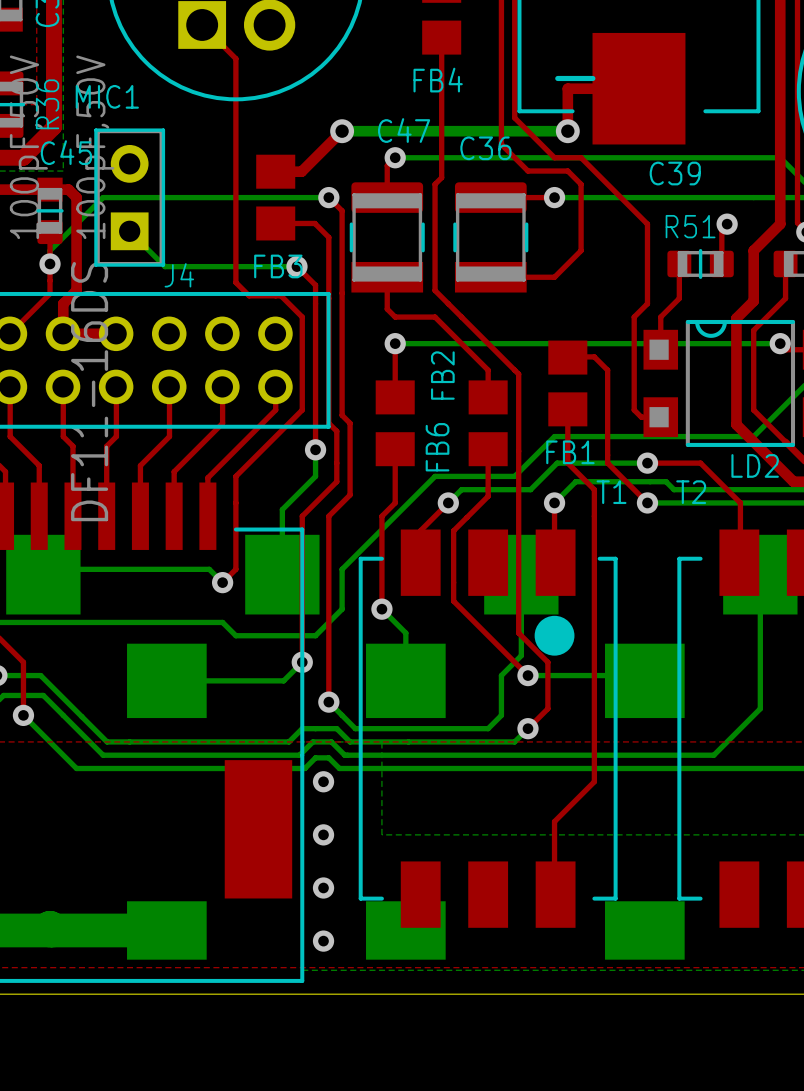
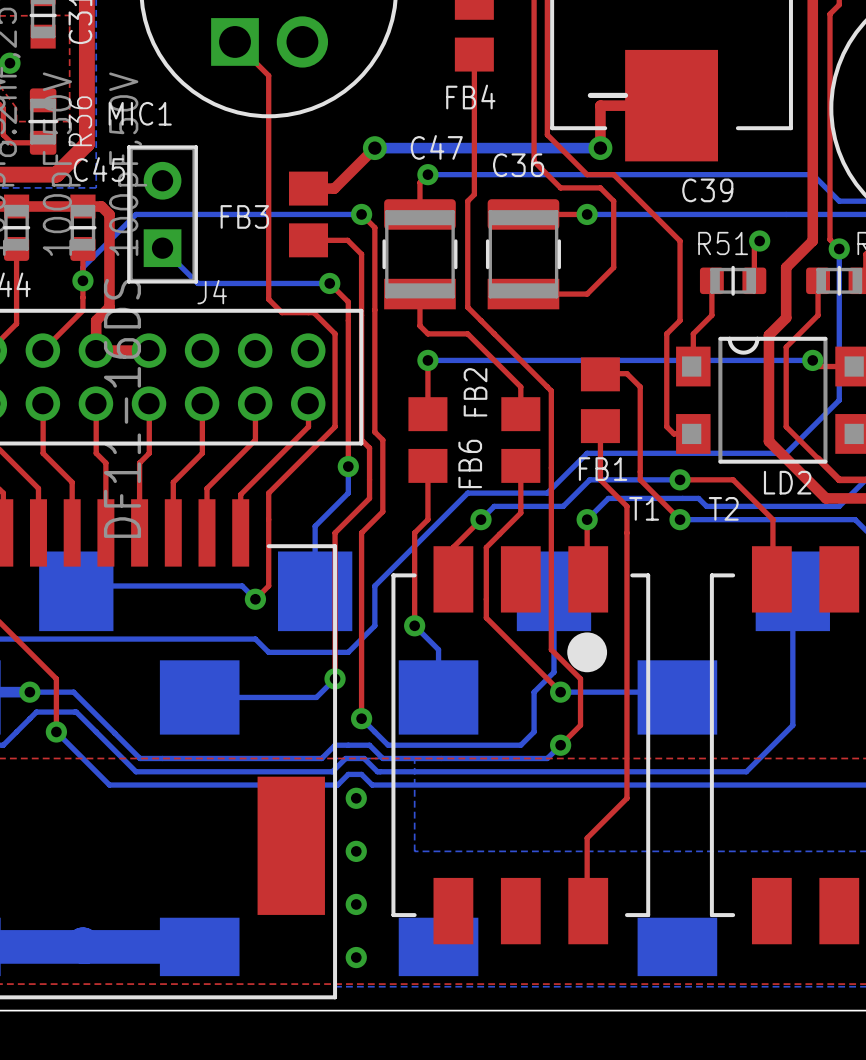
FB3 name position: FB3 (278, 266) -> FB3 (244, 216)

